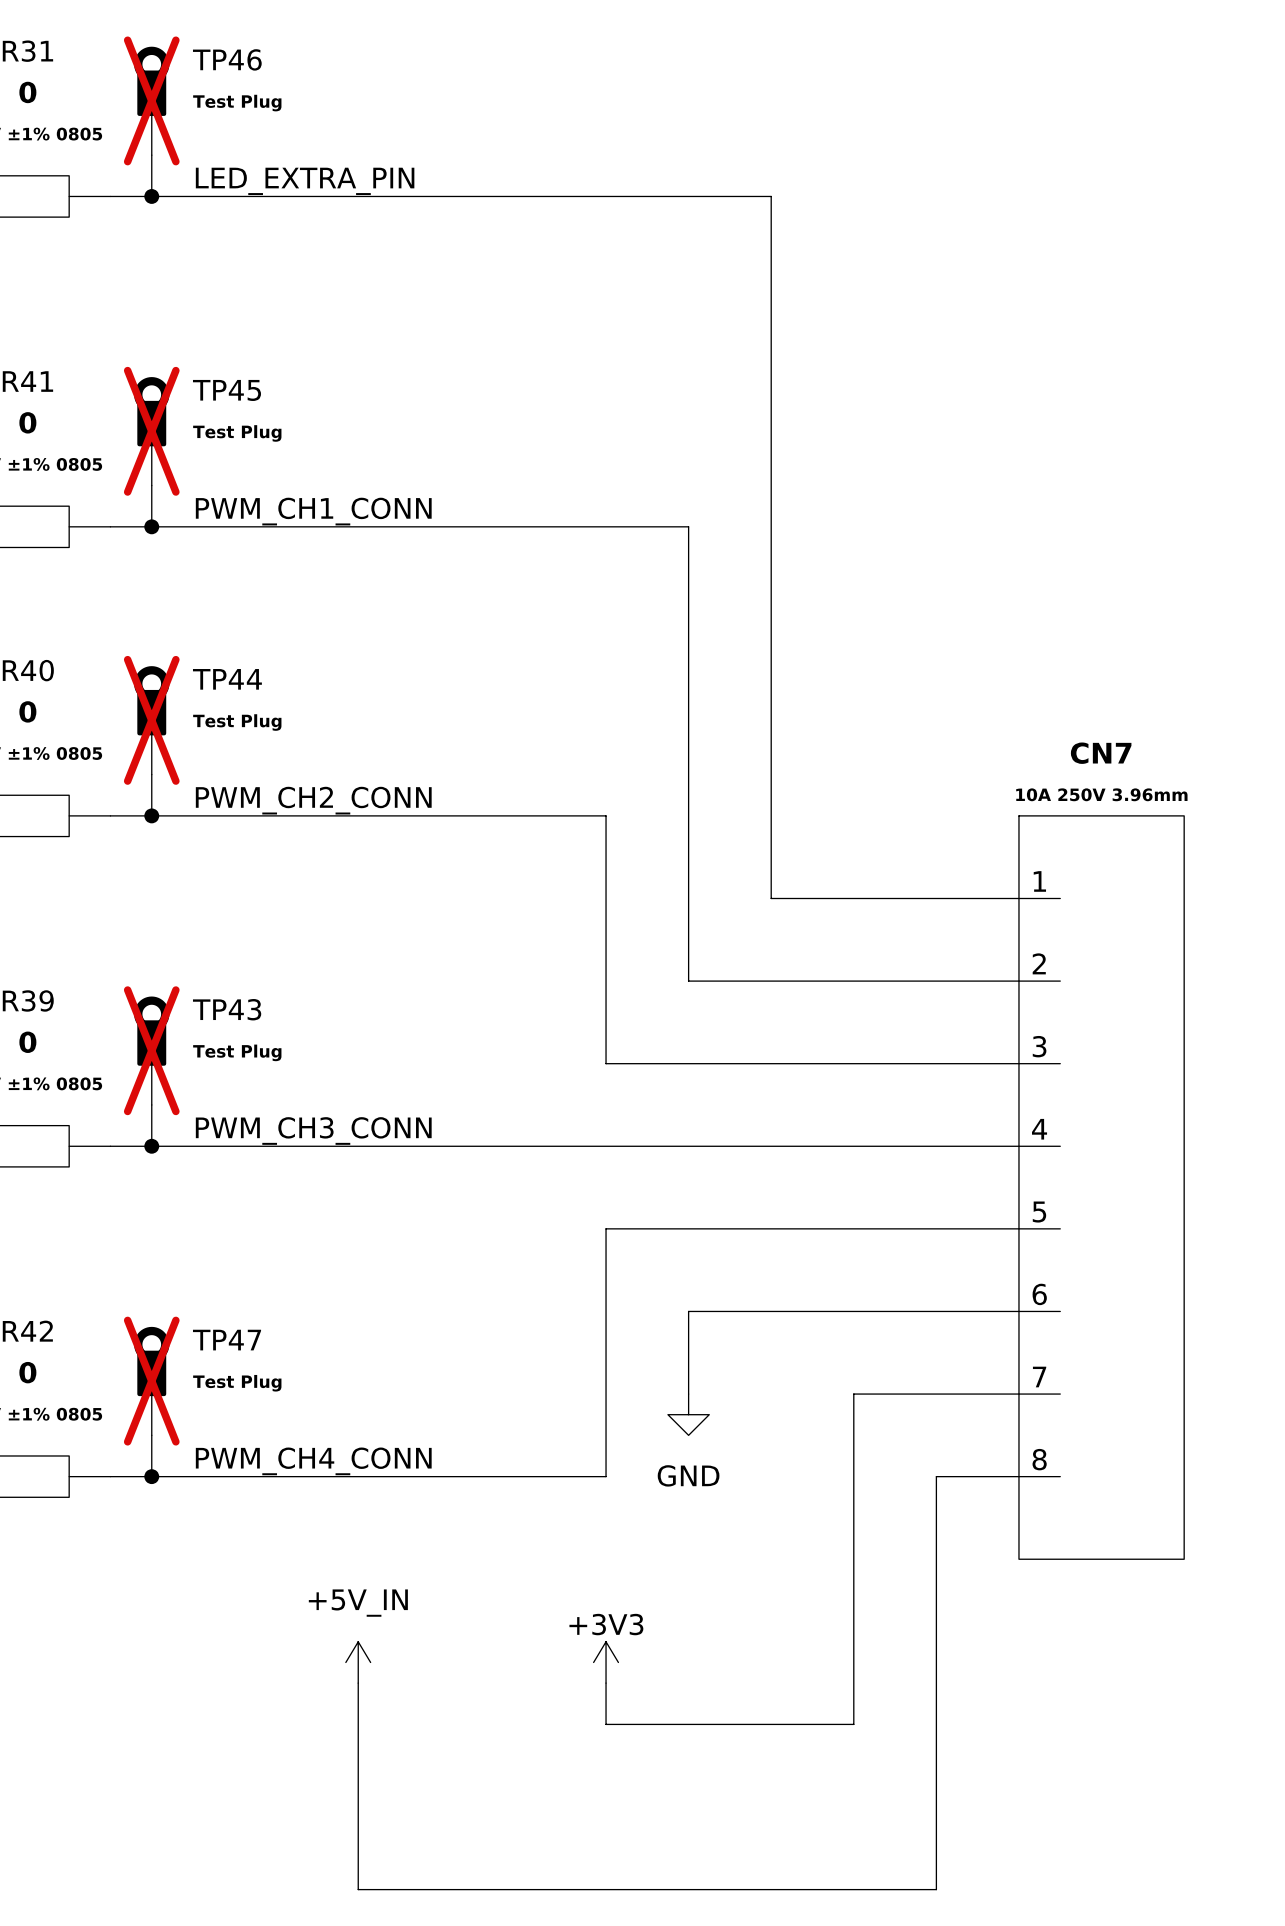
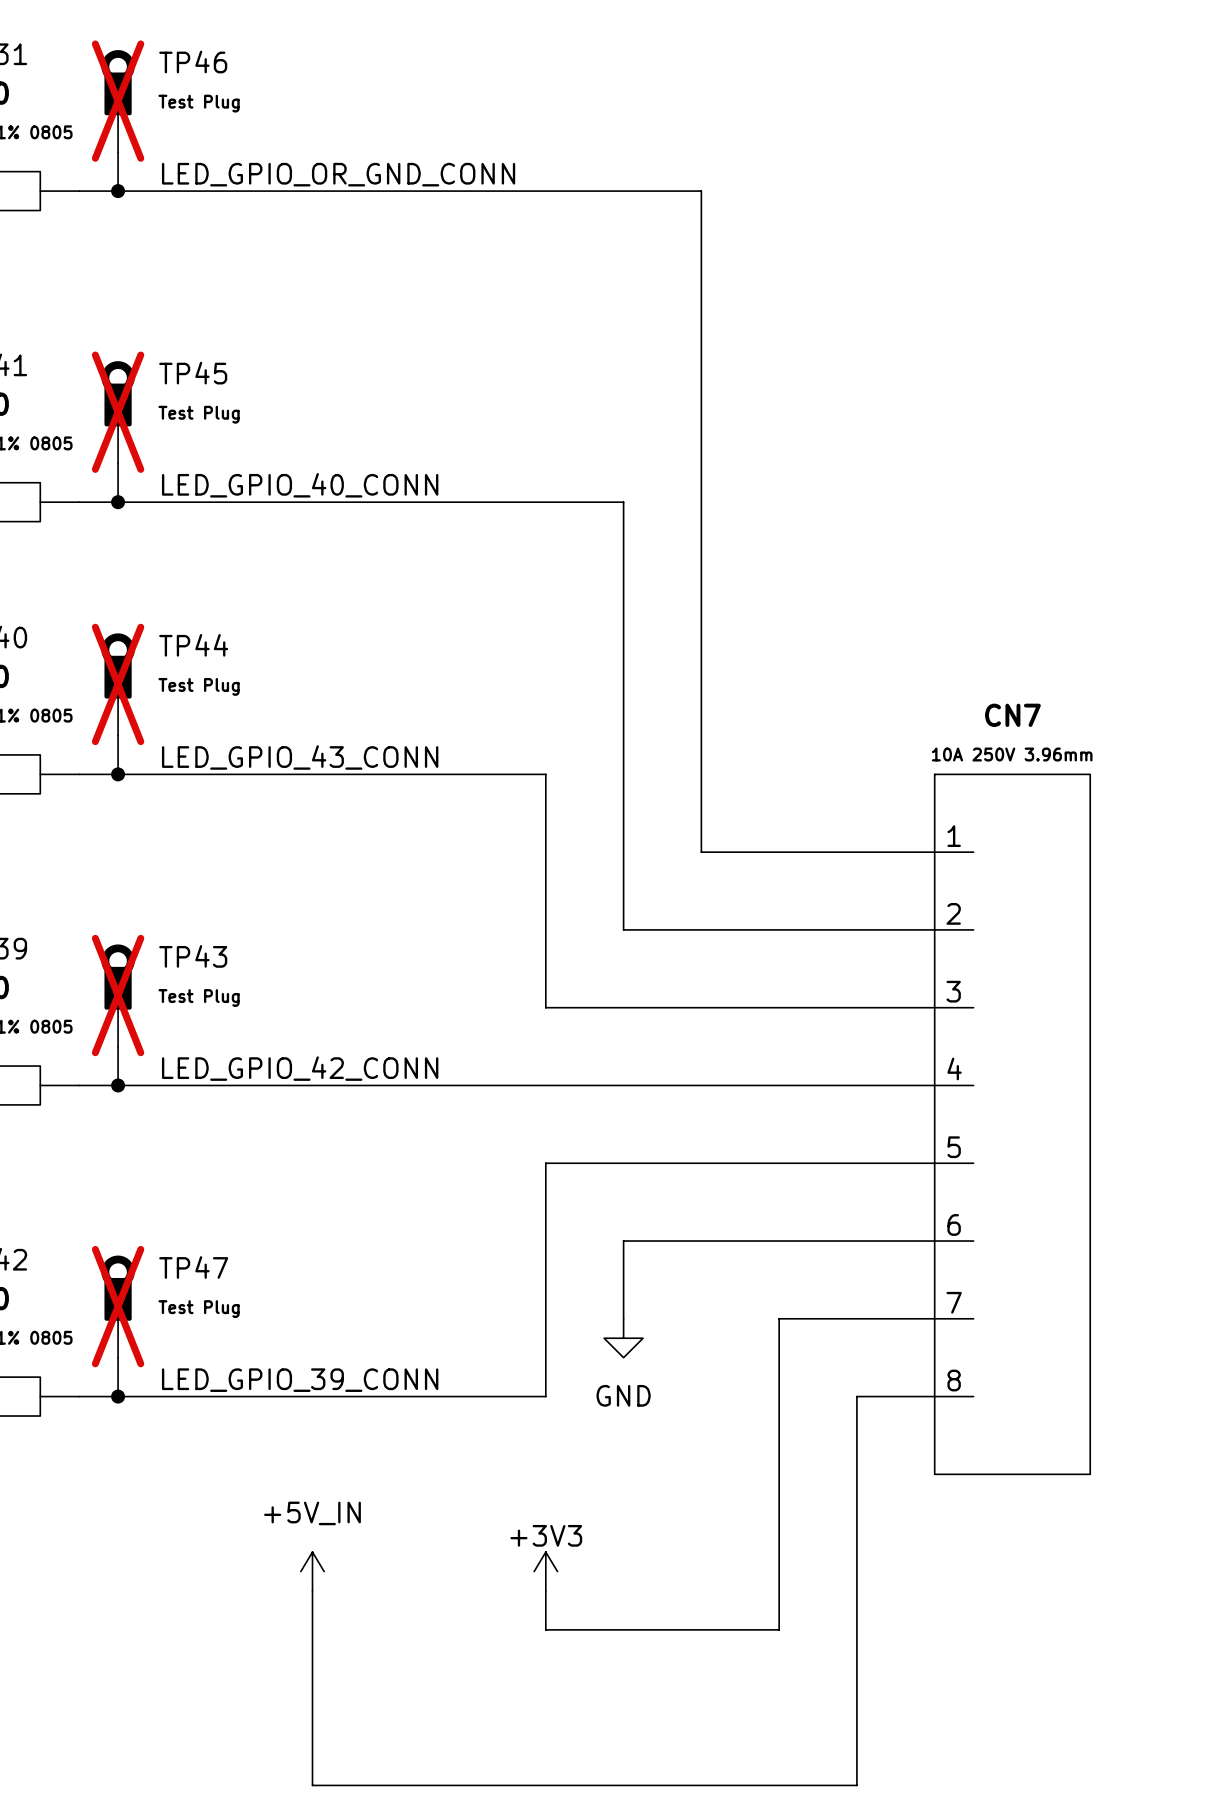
label: LED_EXTRA_PIN (305, 181) -> LED_GPIO_OR_GND_CONN (338, 174)
label: PWM_CH1_CONN (313, 511) -> LED_GPIO_40_CONN (300, 485)
label: PWM_CH2_CONN (313, 800) -> LED_GPIO_43_CONN (300, 757)
label: PWM_CH3_CONN (313, 1131) -> LED_GPIO_42_CONN (300, 1068)
label: PWM_CH4_CONN (313, 1461) -> LED_GPIO_39_CONN (300, 1380)

